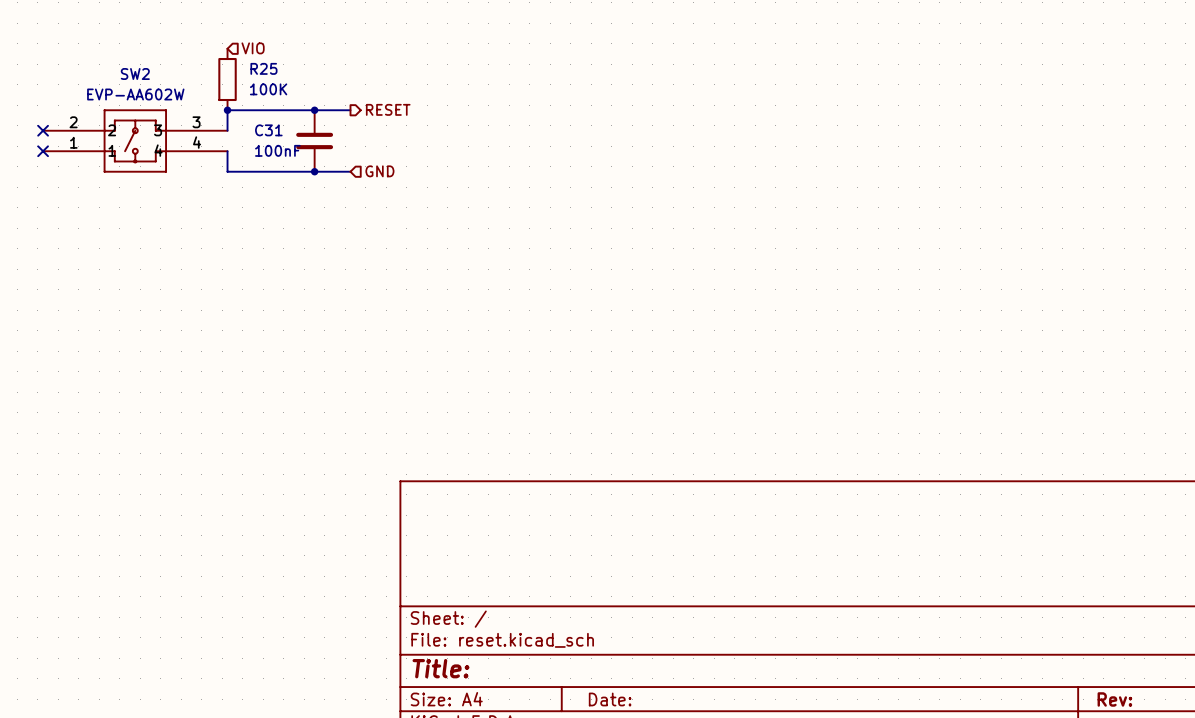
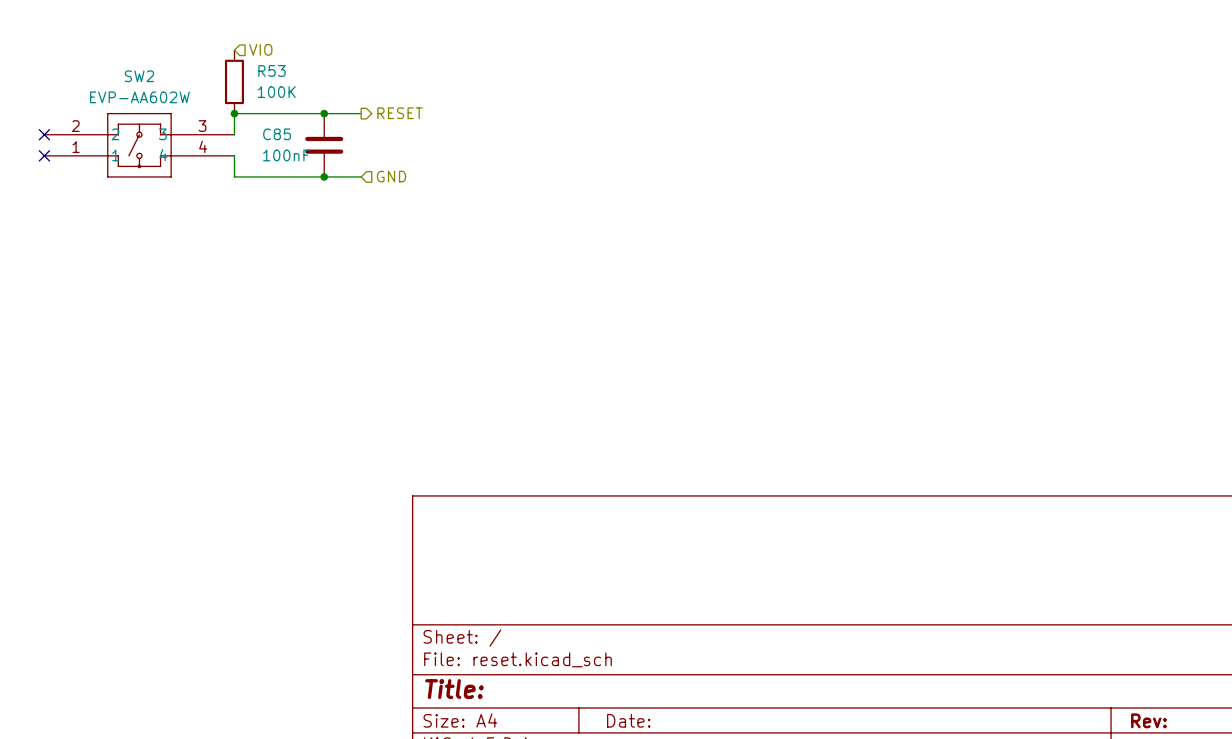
R25 name: R25 (263, 68) -> R53 (272, 70)
C31 name: C31 (268, 130) -> C85 (277, 134)

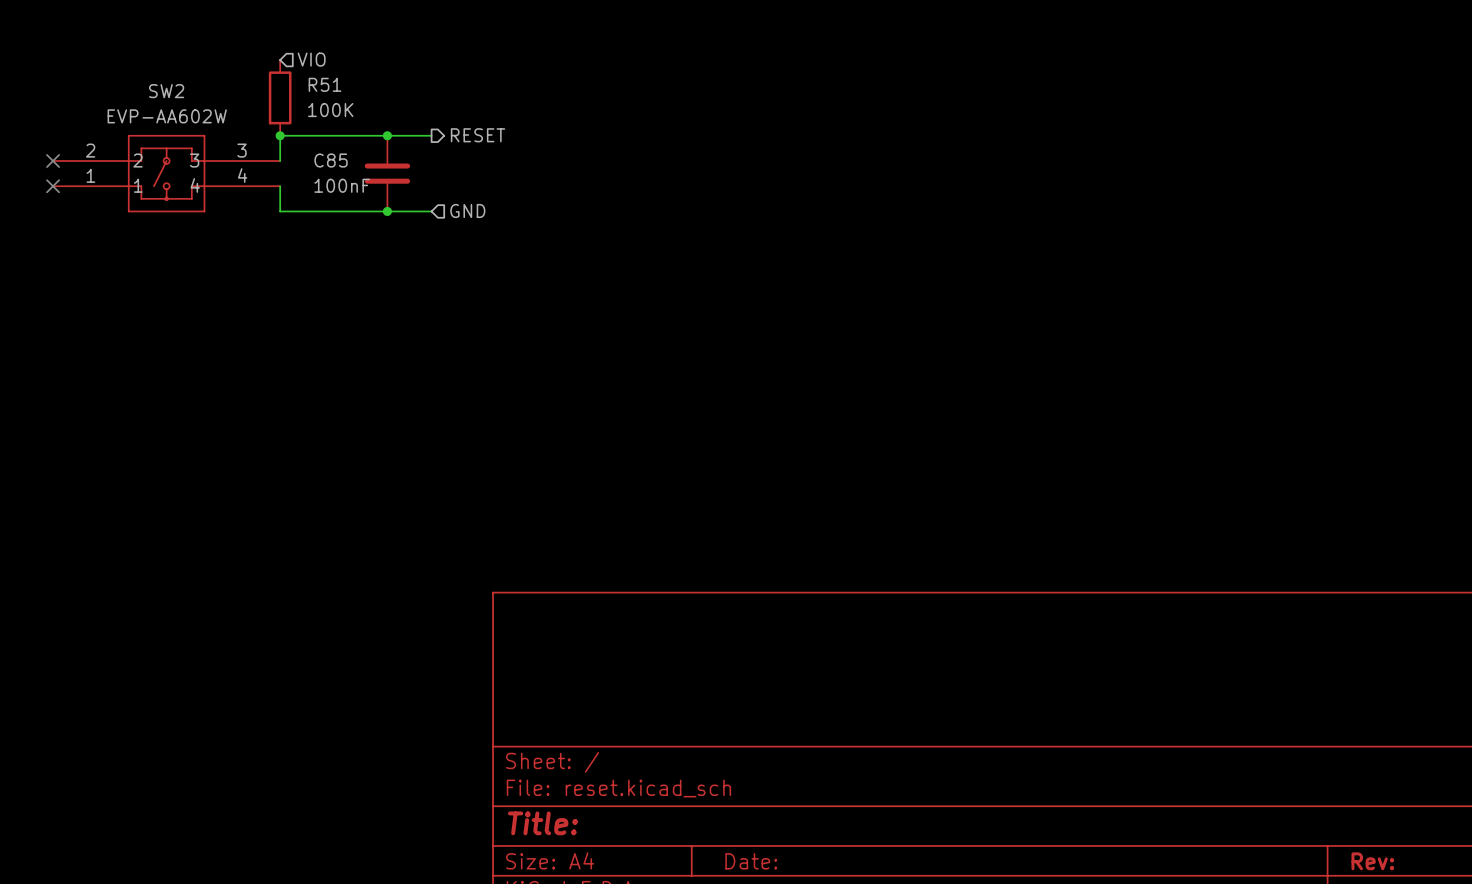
R53 name: R53 (272, 70) -> R51 (325, 84)

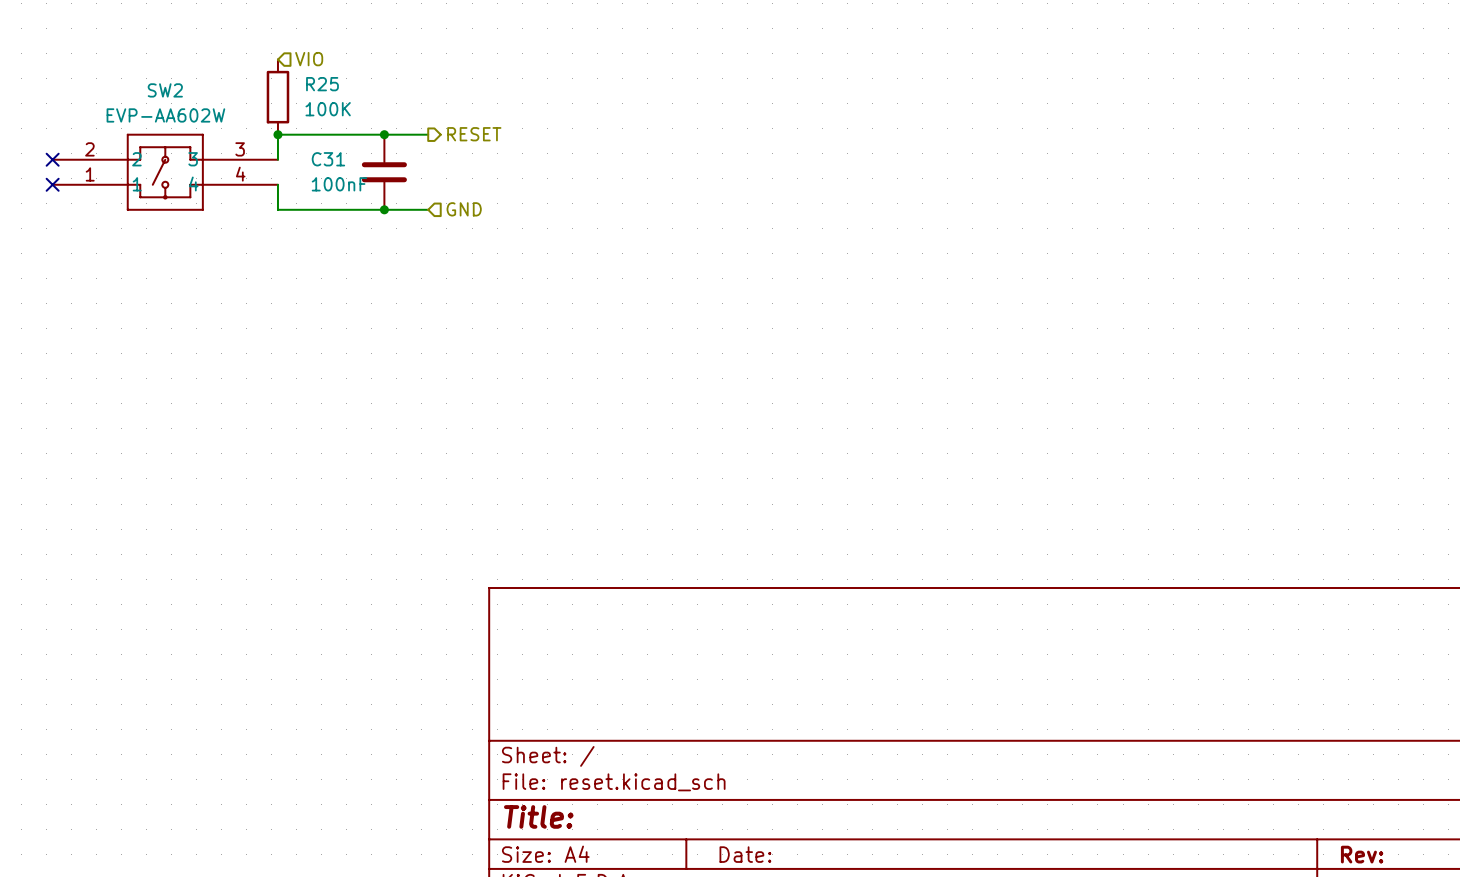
R51 name: R51 (325, 84) -> R25 (322, 84)
C85 name: C85 (331, 160) -> C31 (328, 159)

